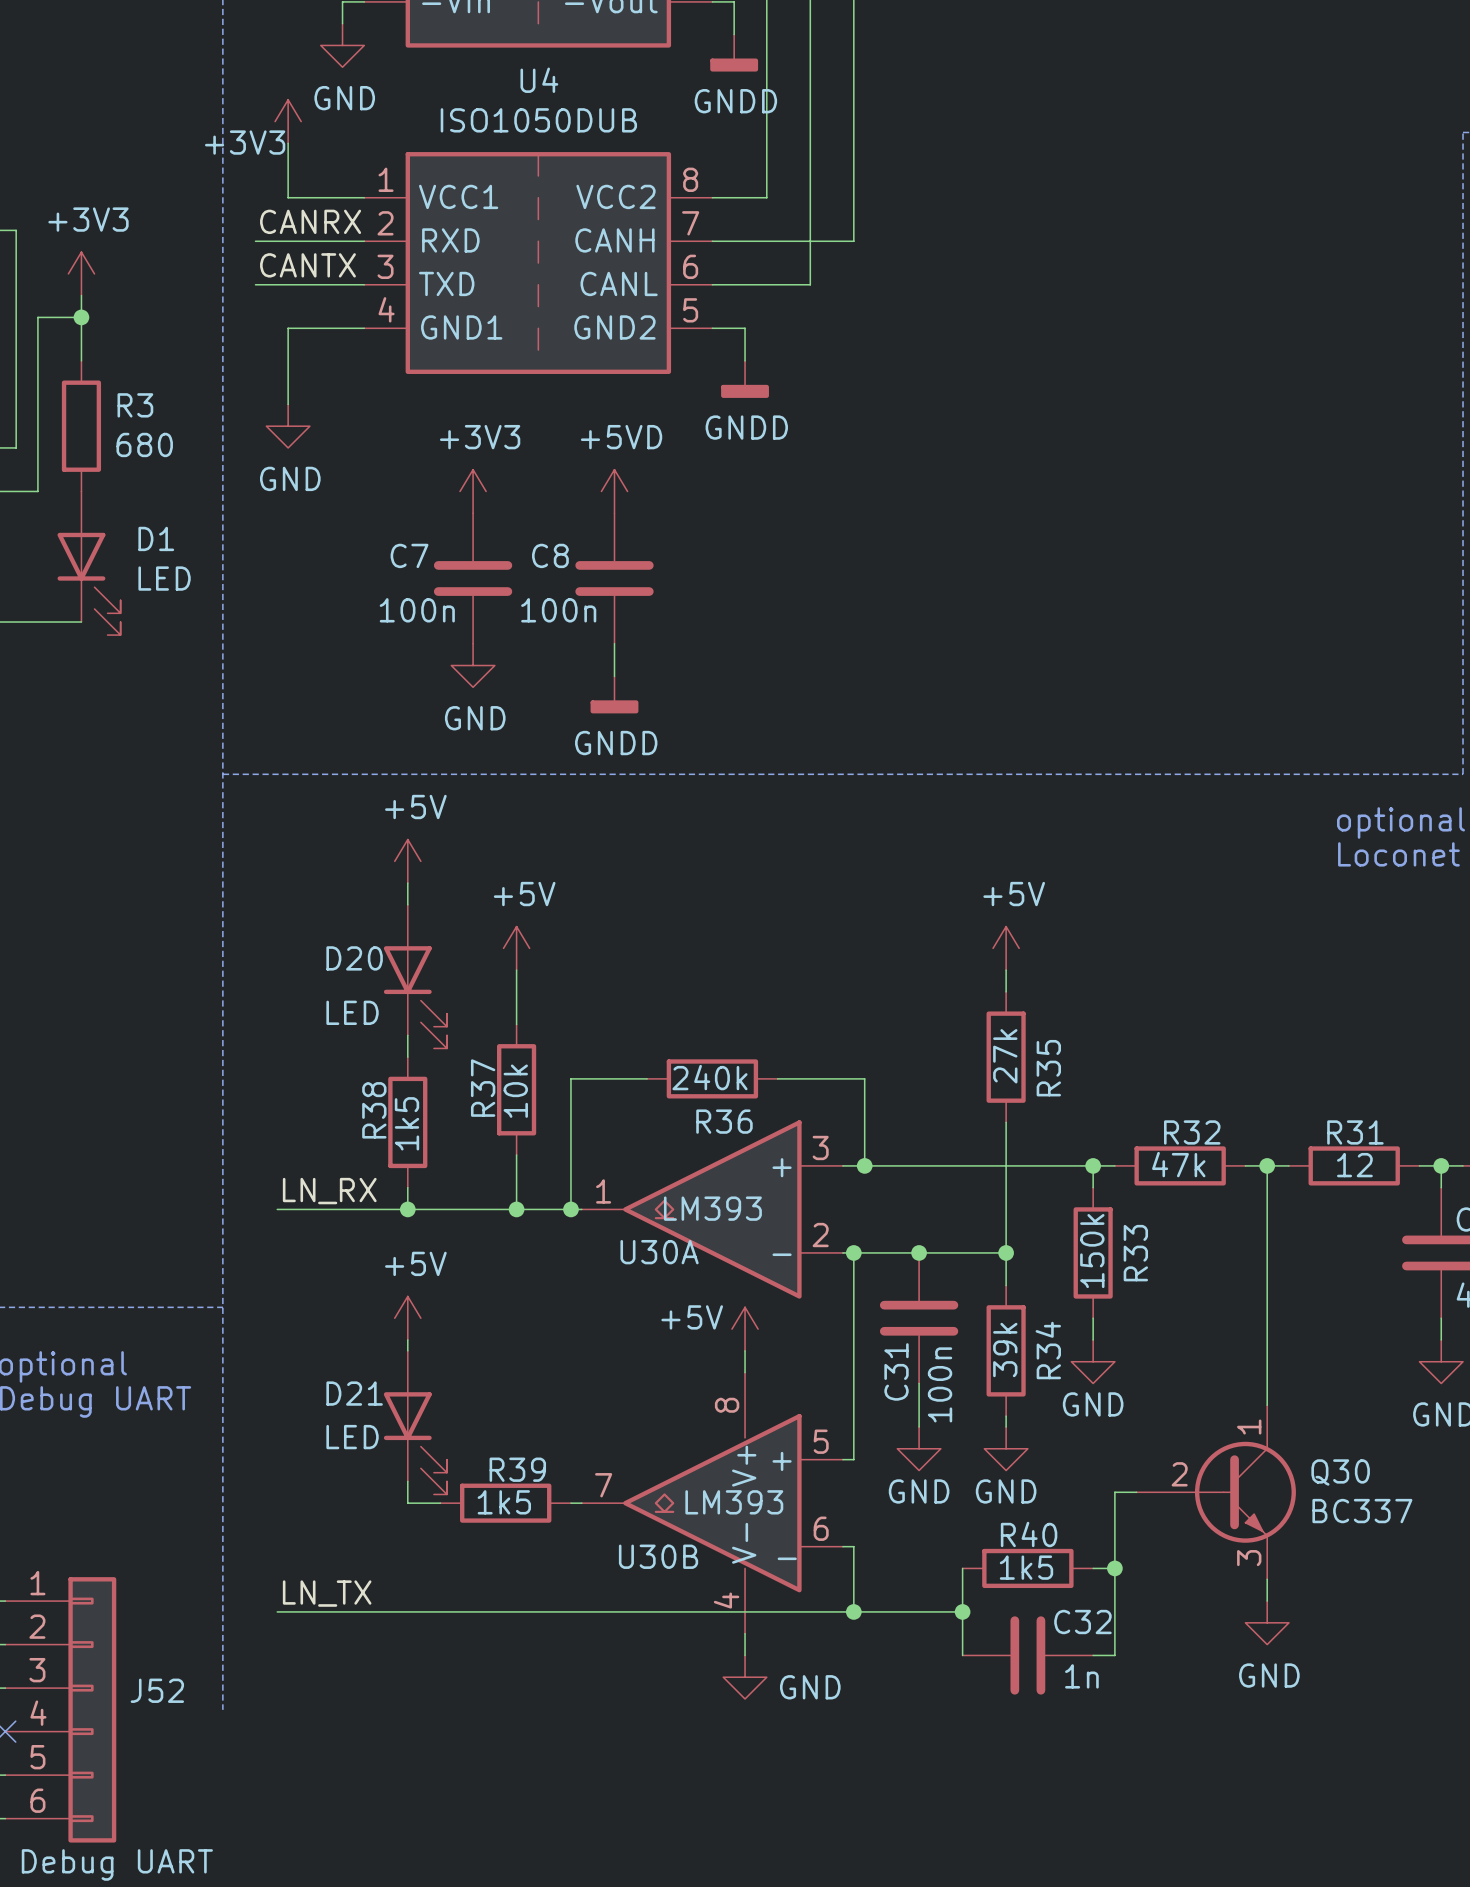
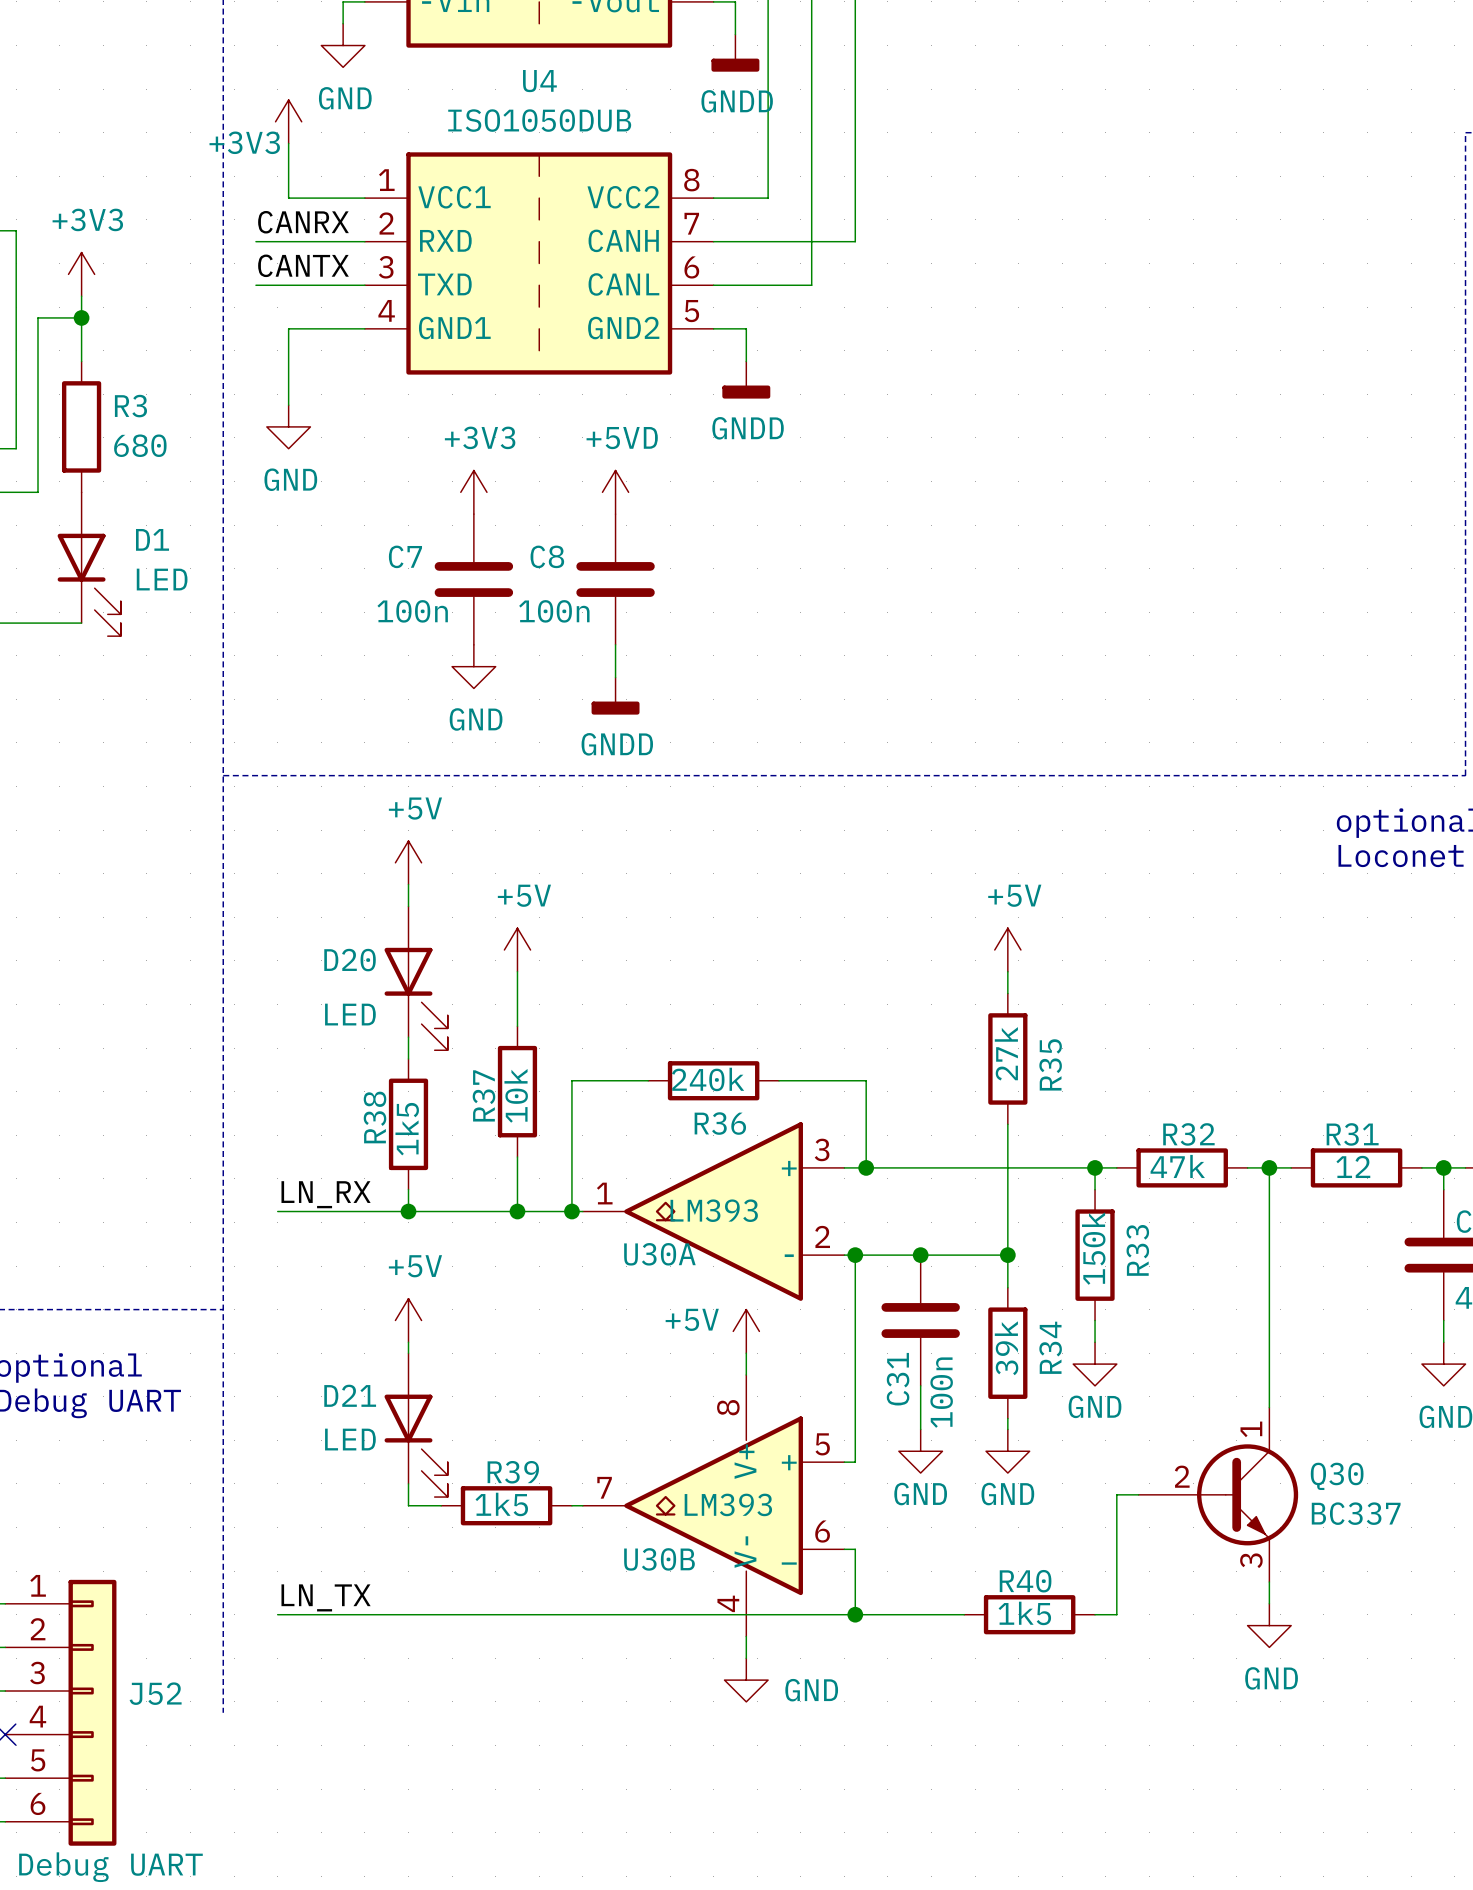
wire: (962, 1568) (962, 1655) -> none
R40 position: (1027, 1568) -> (1029, 1614)
wire: (1093, 1568) (1114, 1568) -> none
junction: (1114, 1568) -> none
junction: (962, 1611) -> none
wire: (1114, 1611) (1114, 1655) (1093, 1655) -> (1116, 1614) (1095, 1614)
C32: 1n (1027, 1655) -> none

